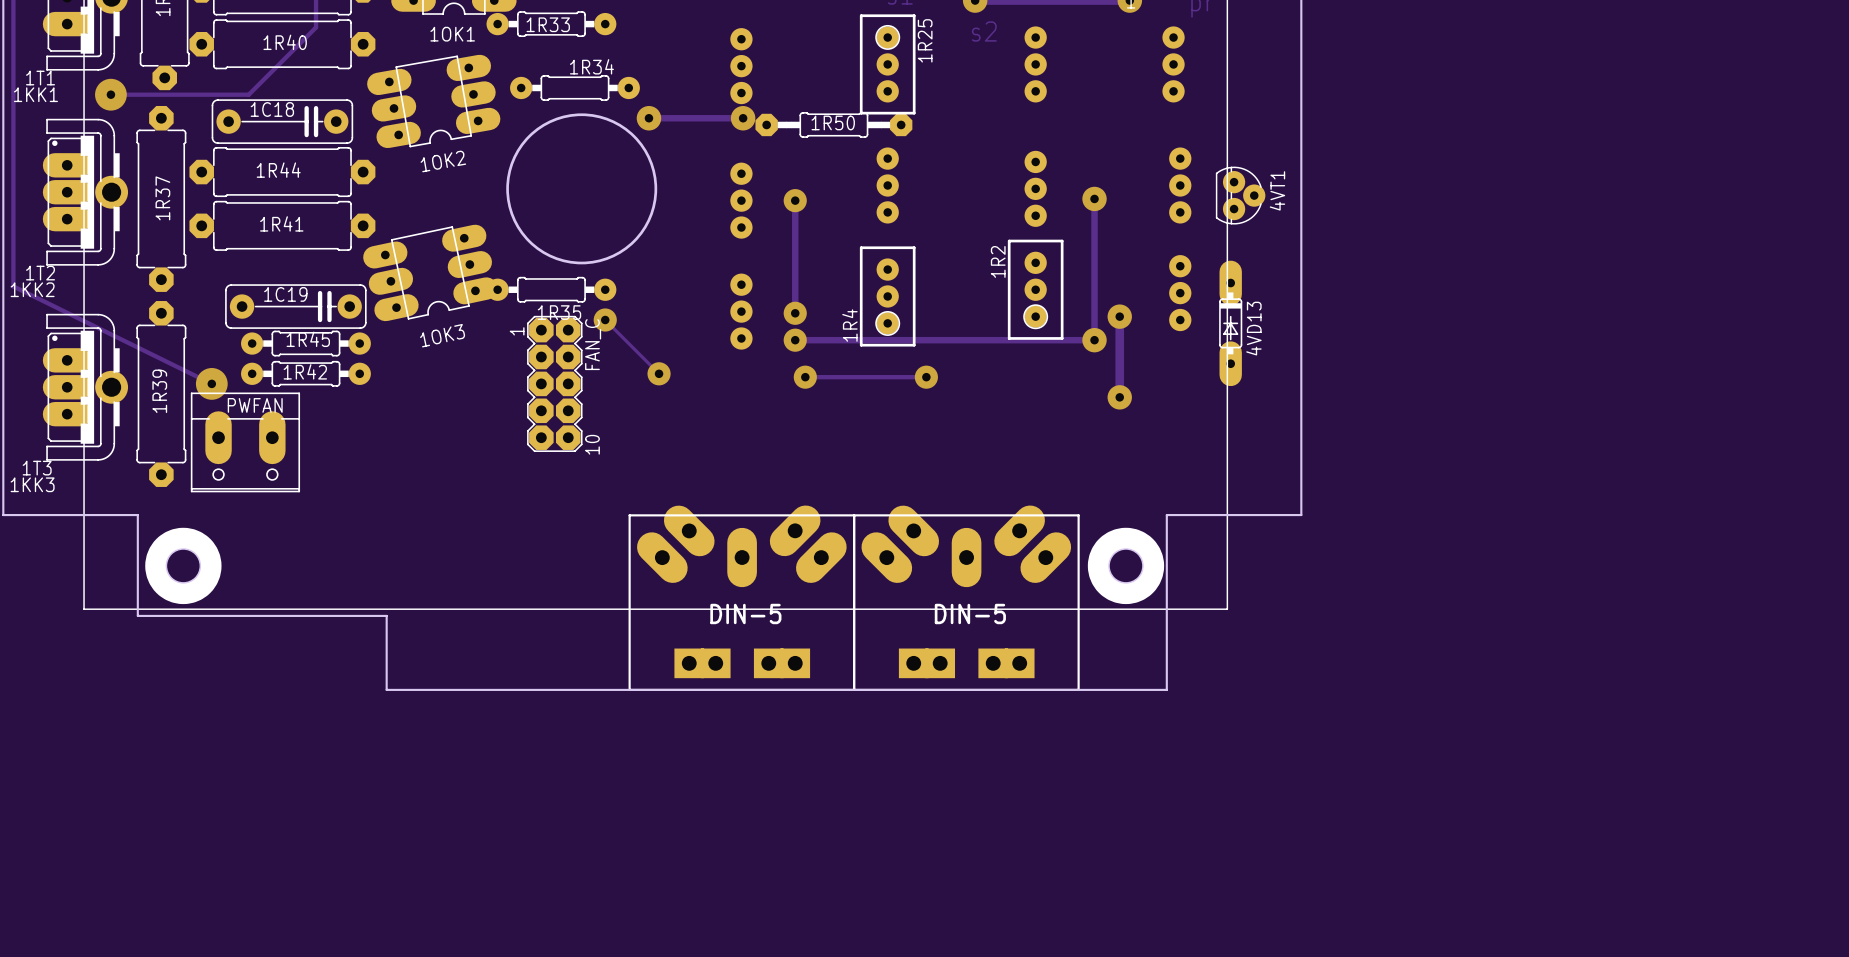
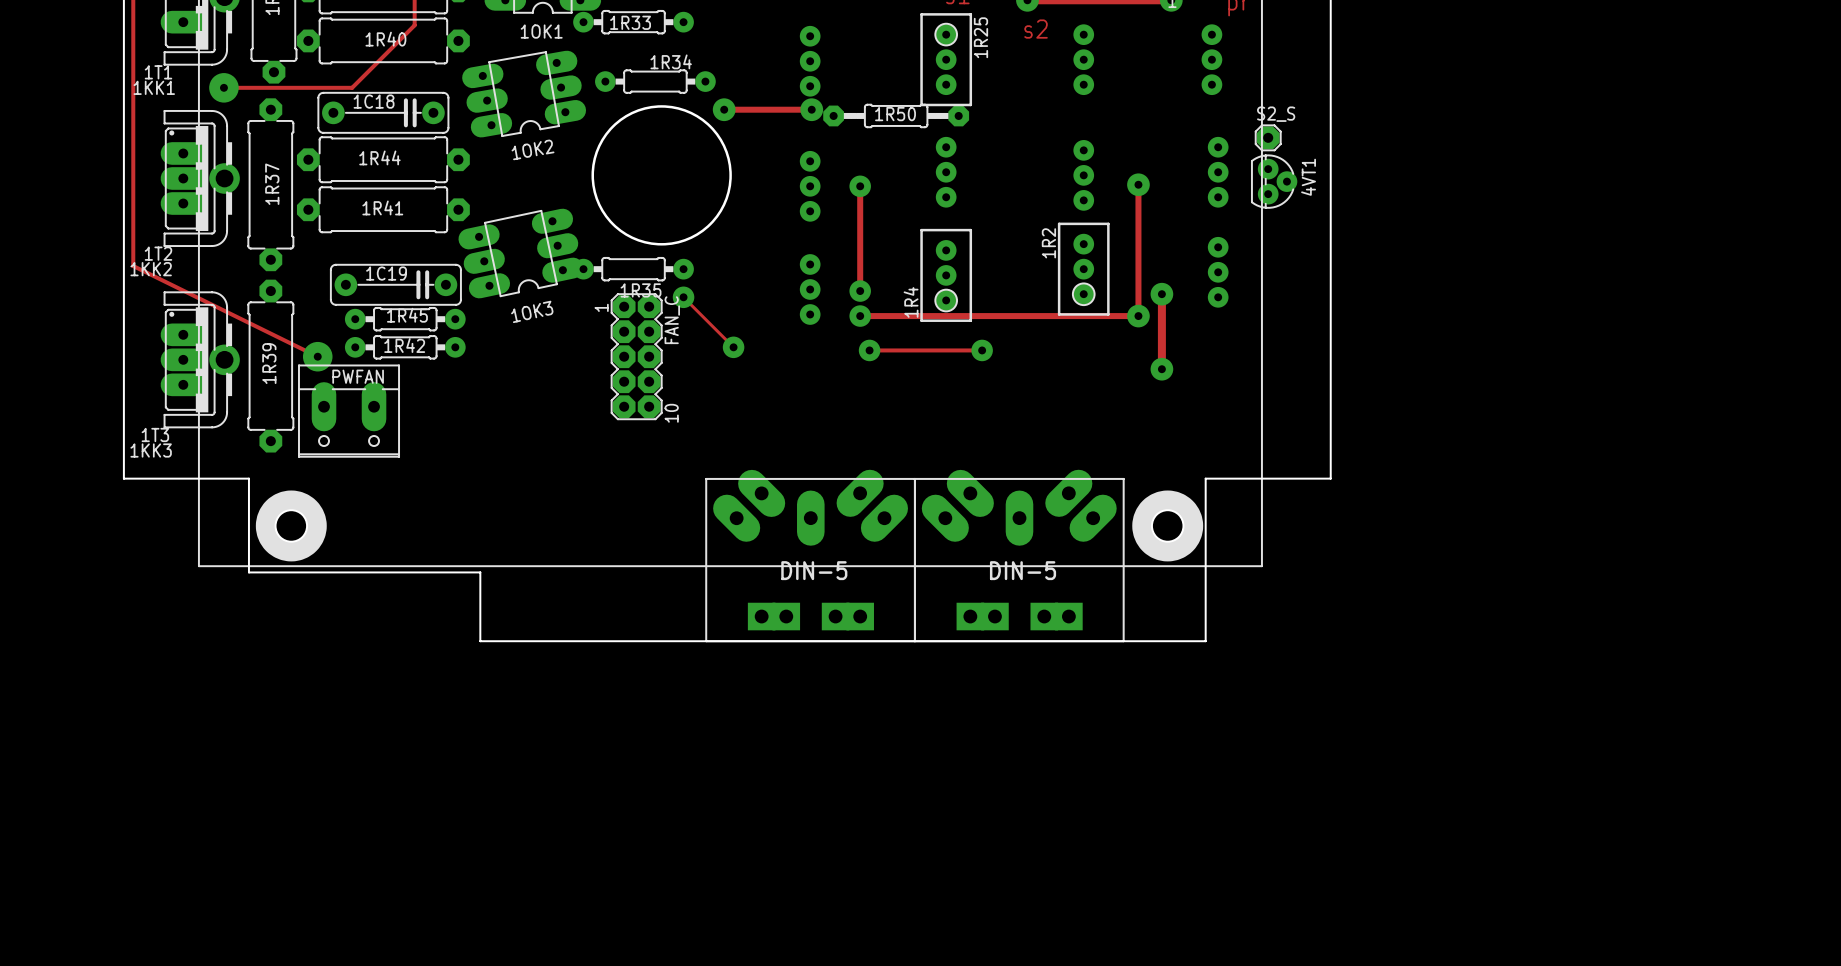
S2_S: none -> (1268, 137)
4VD13: (1230, 323) -> none

